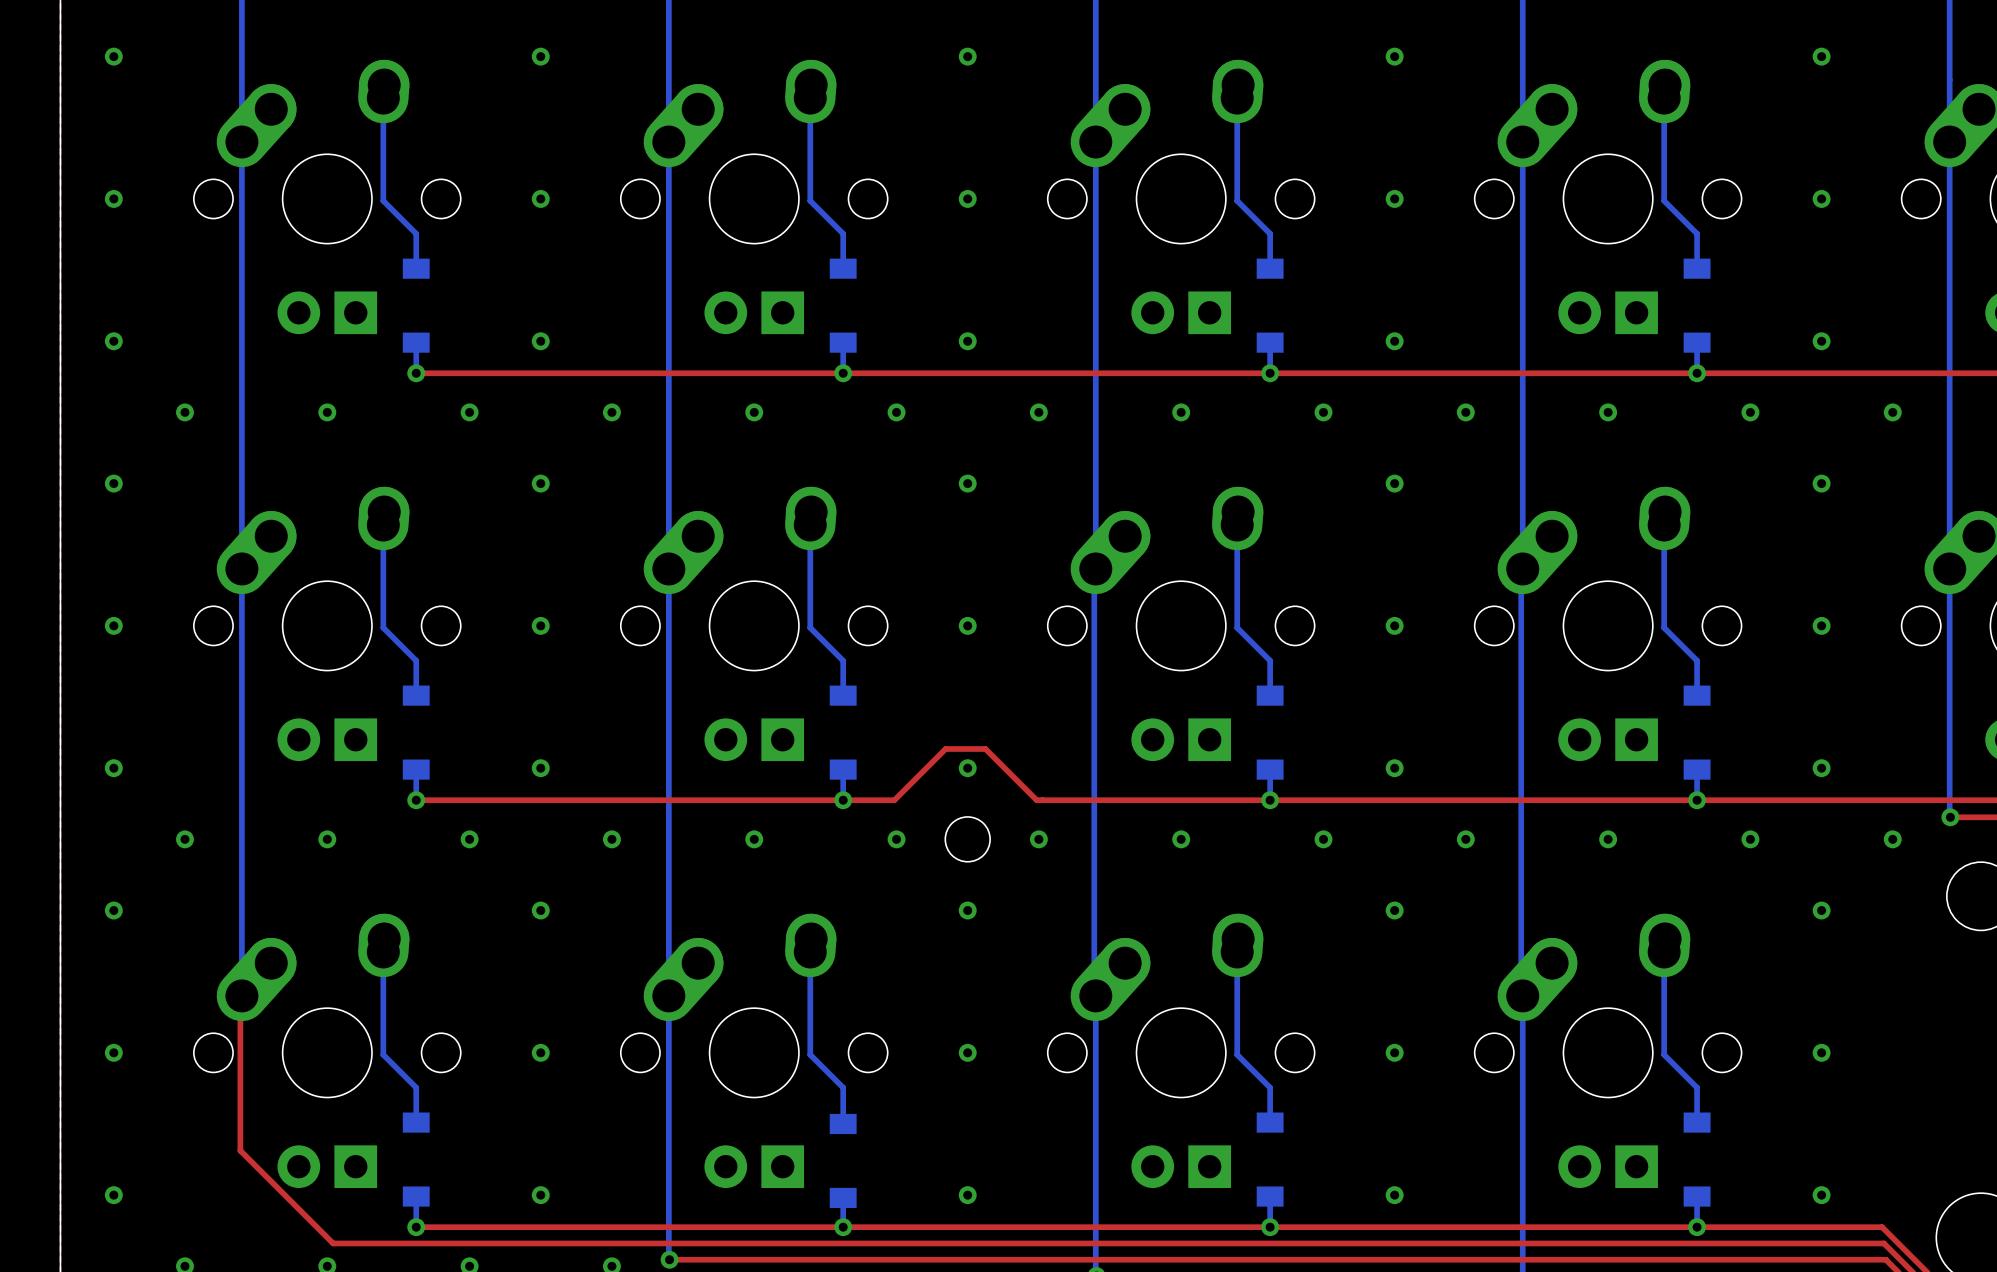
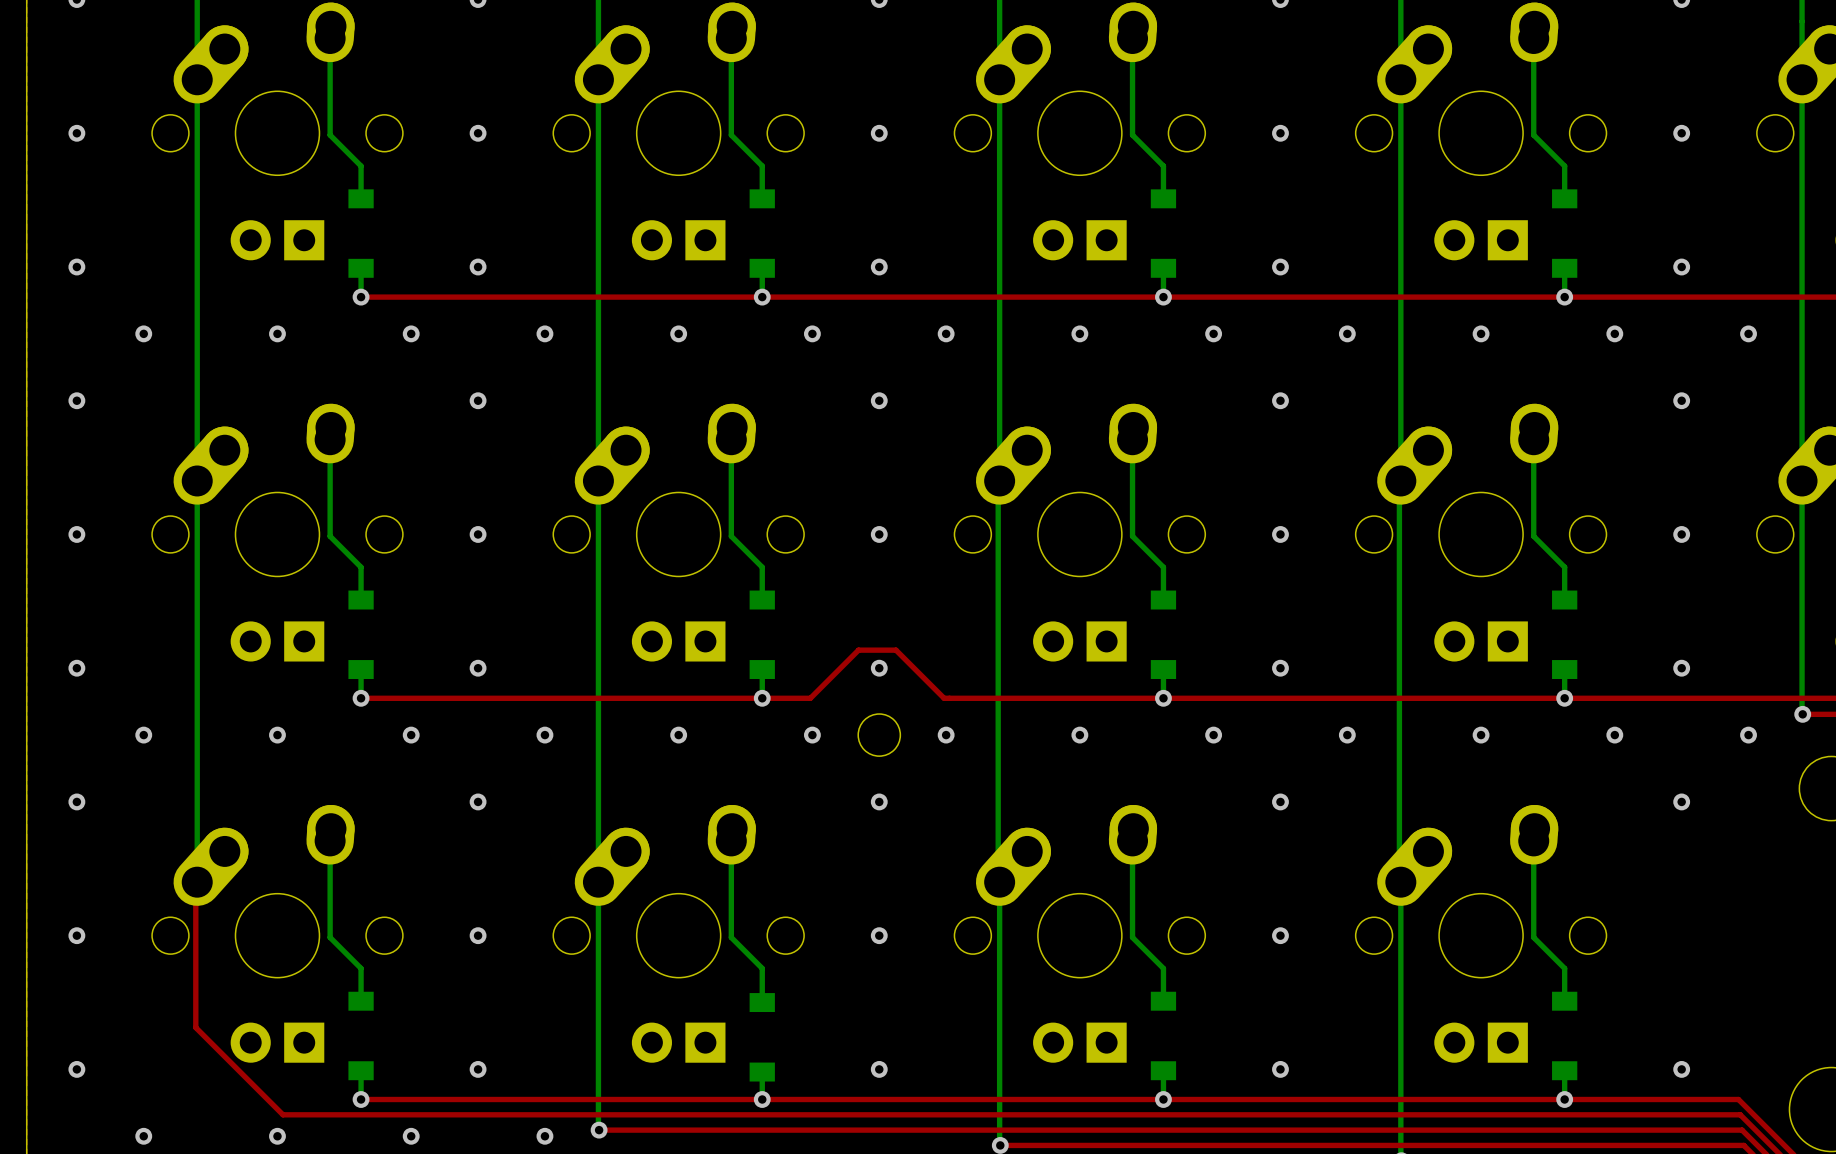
via: (1821, 1052) -> none

